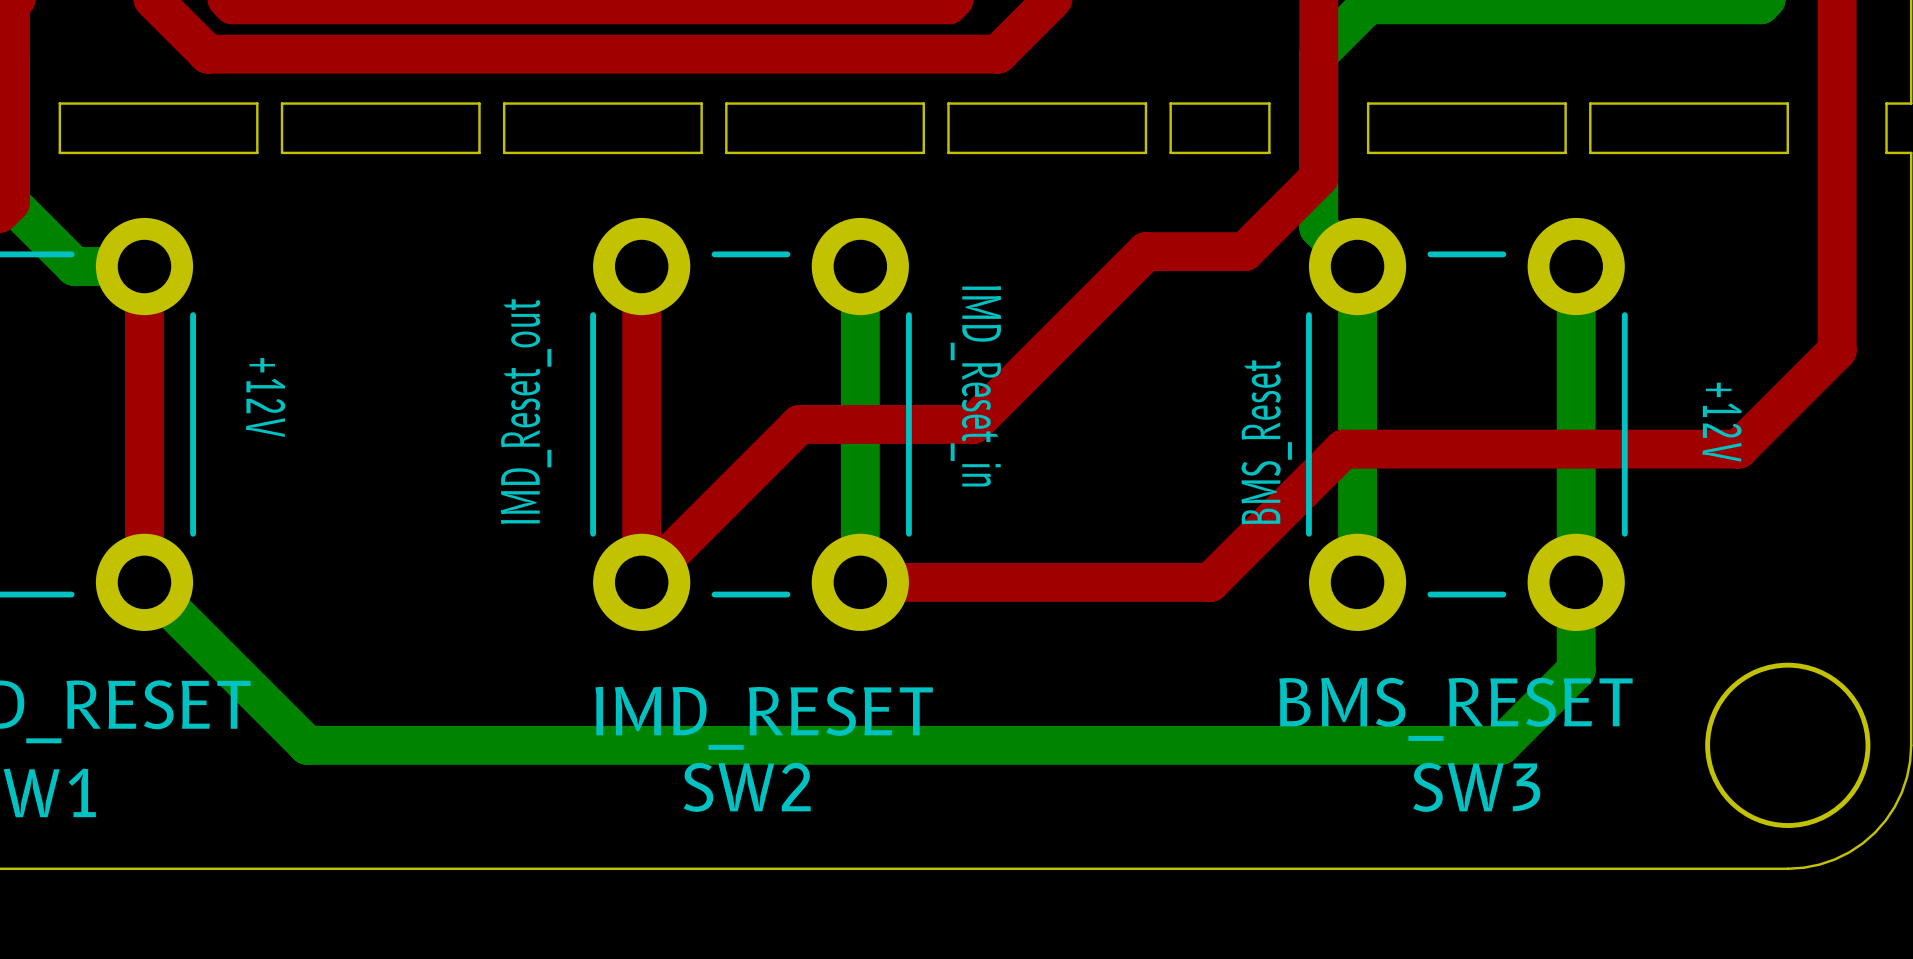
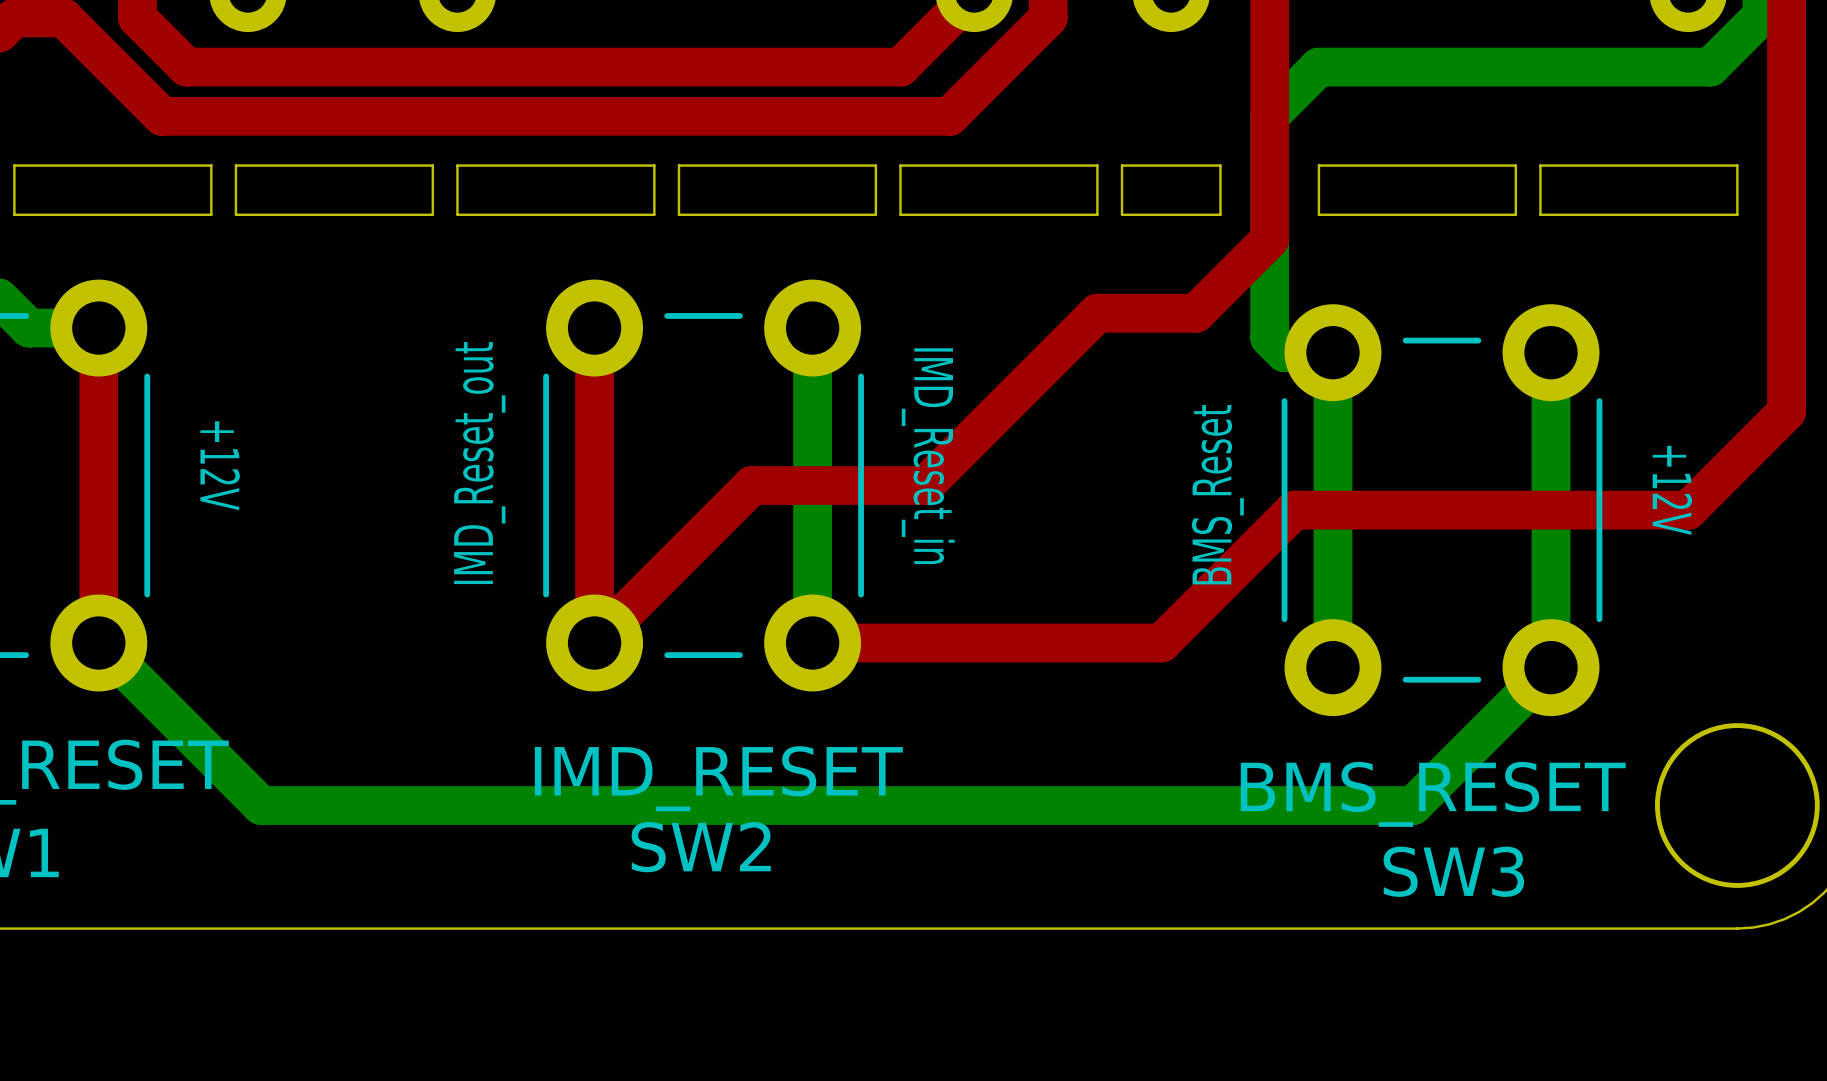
bottom track: (1318, 227) (1357, 266) (1357, 582) -> (1269, 289) (1269, 337) (1284, 352) (1332, 352) (1332, 667)
bottom track: (1576, 266) (1576, 670) (1500, 745) (1462, 745) -> (1551, 352) (1551, 667) (1413, 805)
SW3 position: (1466, 424) -> (1441, 510)

